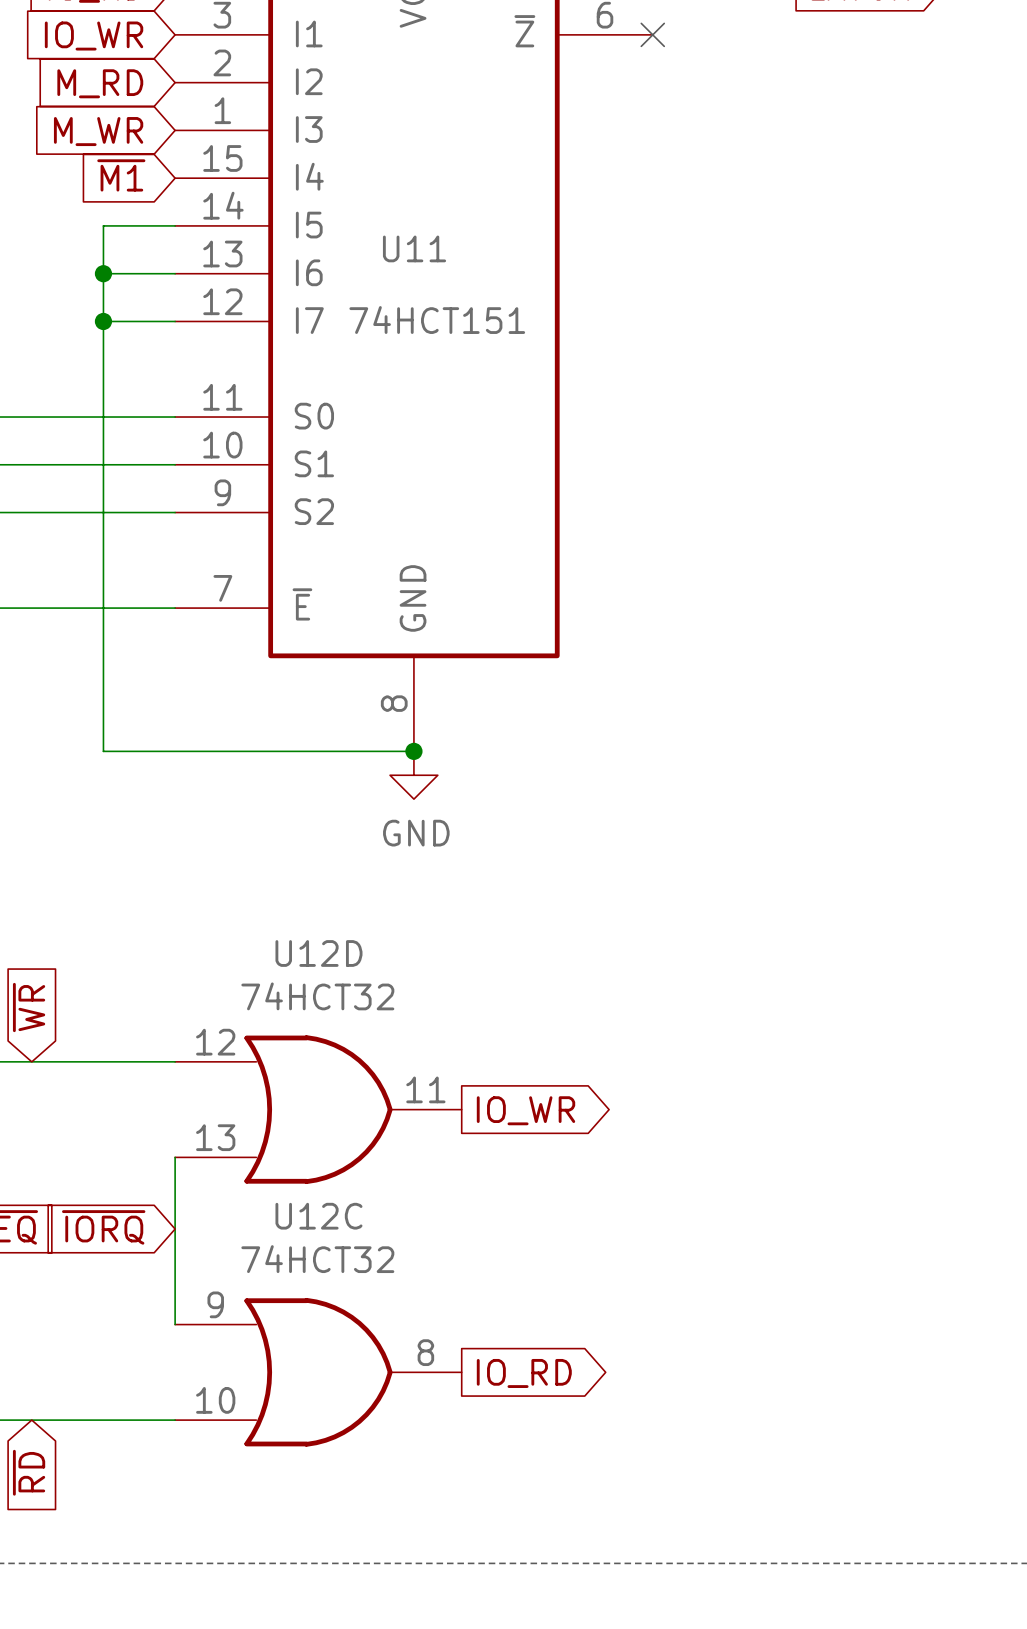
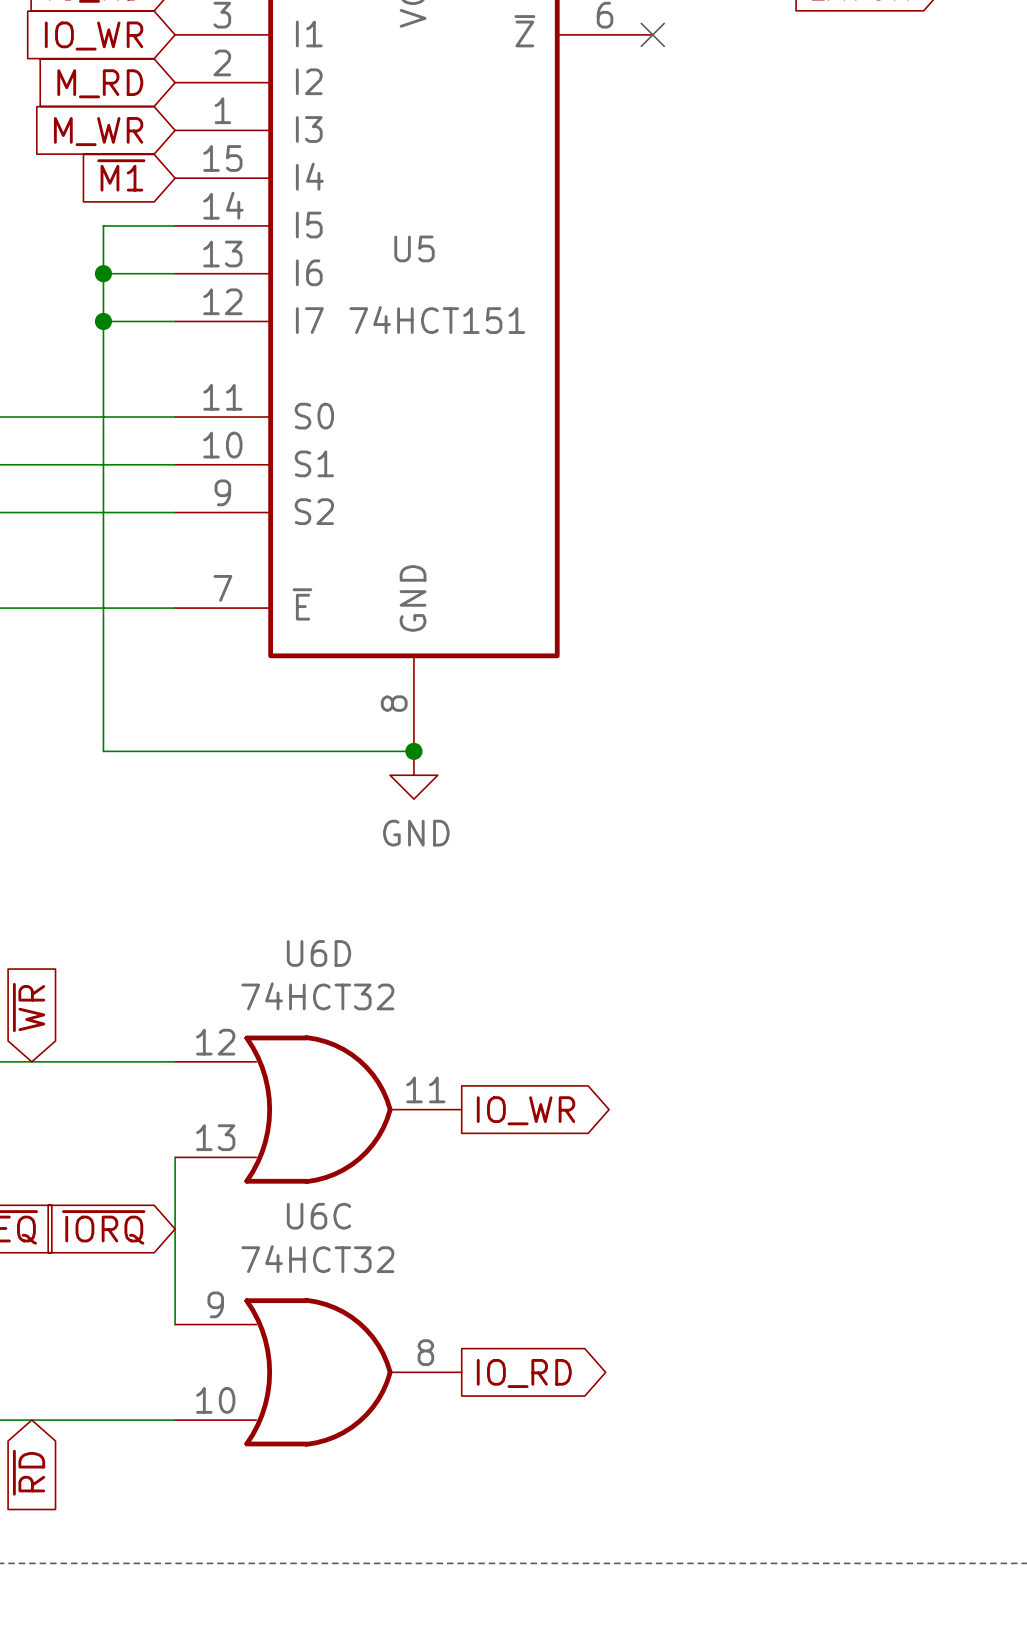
U11 name: U11 (414, 248) -> U5 (414, 248)
U12D name: U12D (318, 953) -> U6D (318, 953)
U12C name: U12C (318, 1216) -> U6C (318, 1216)

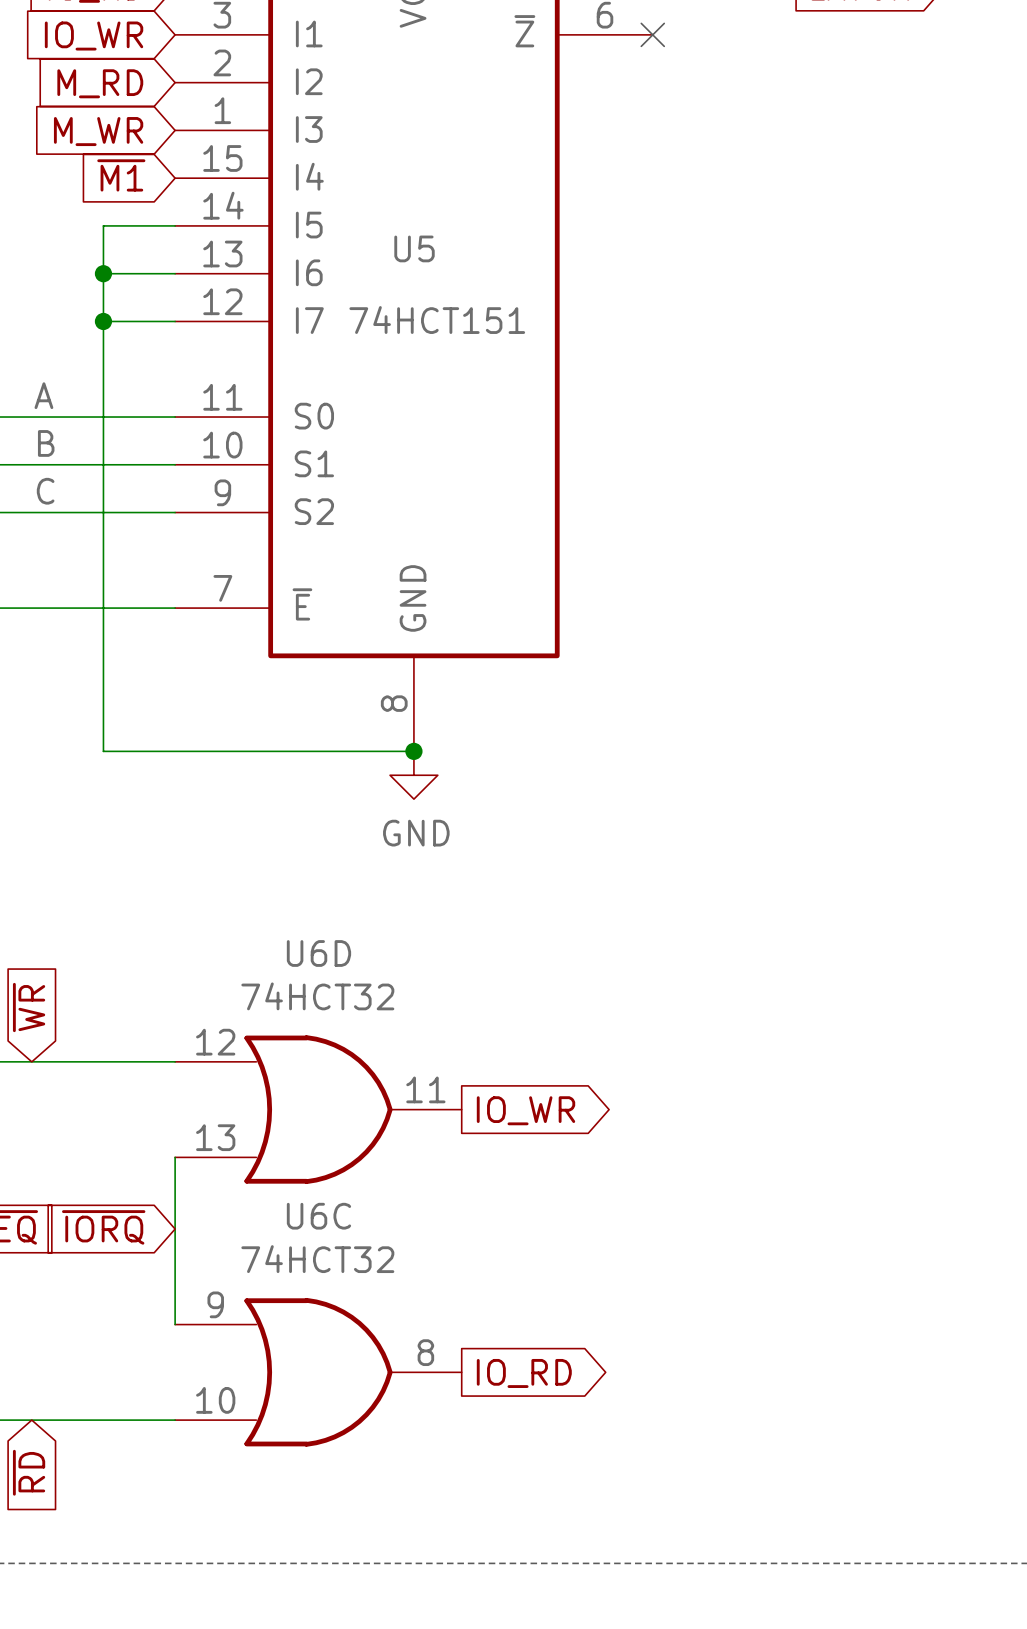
label: none -> A (43, 395)
label: none -> B (46, 443)
label: none -> C (45, 491)

